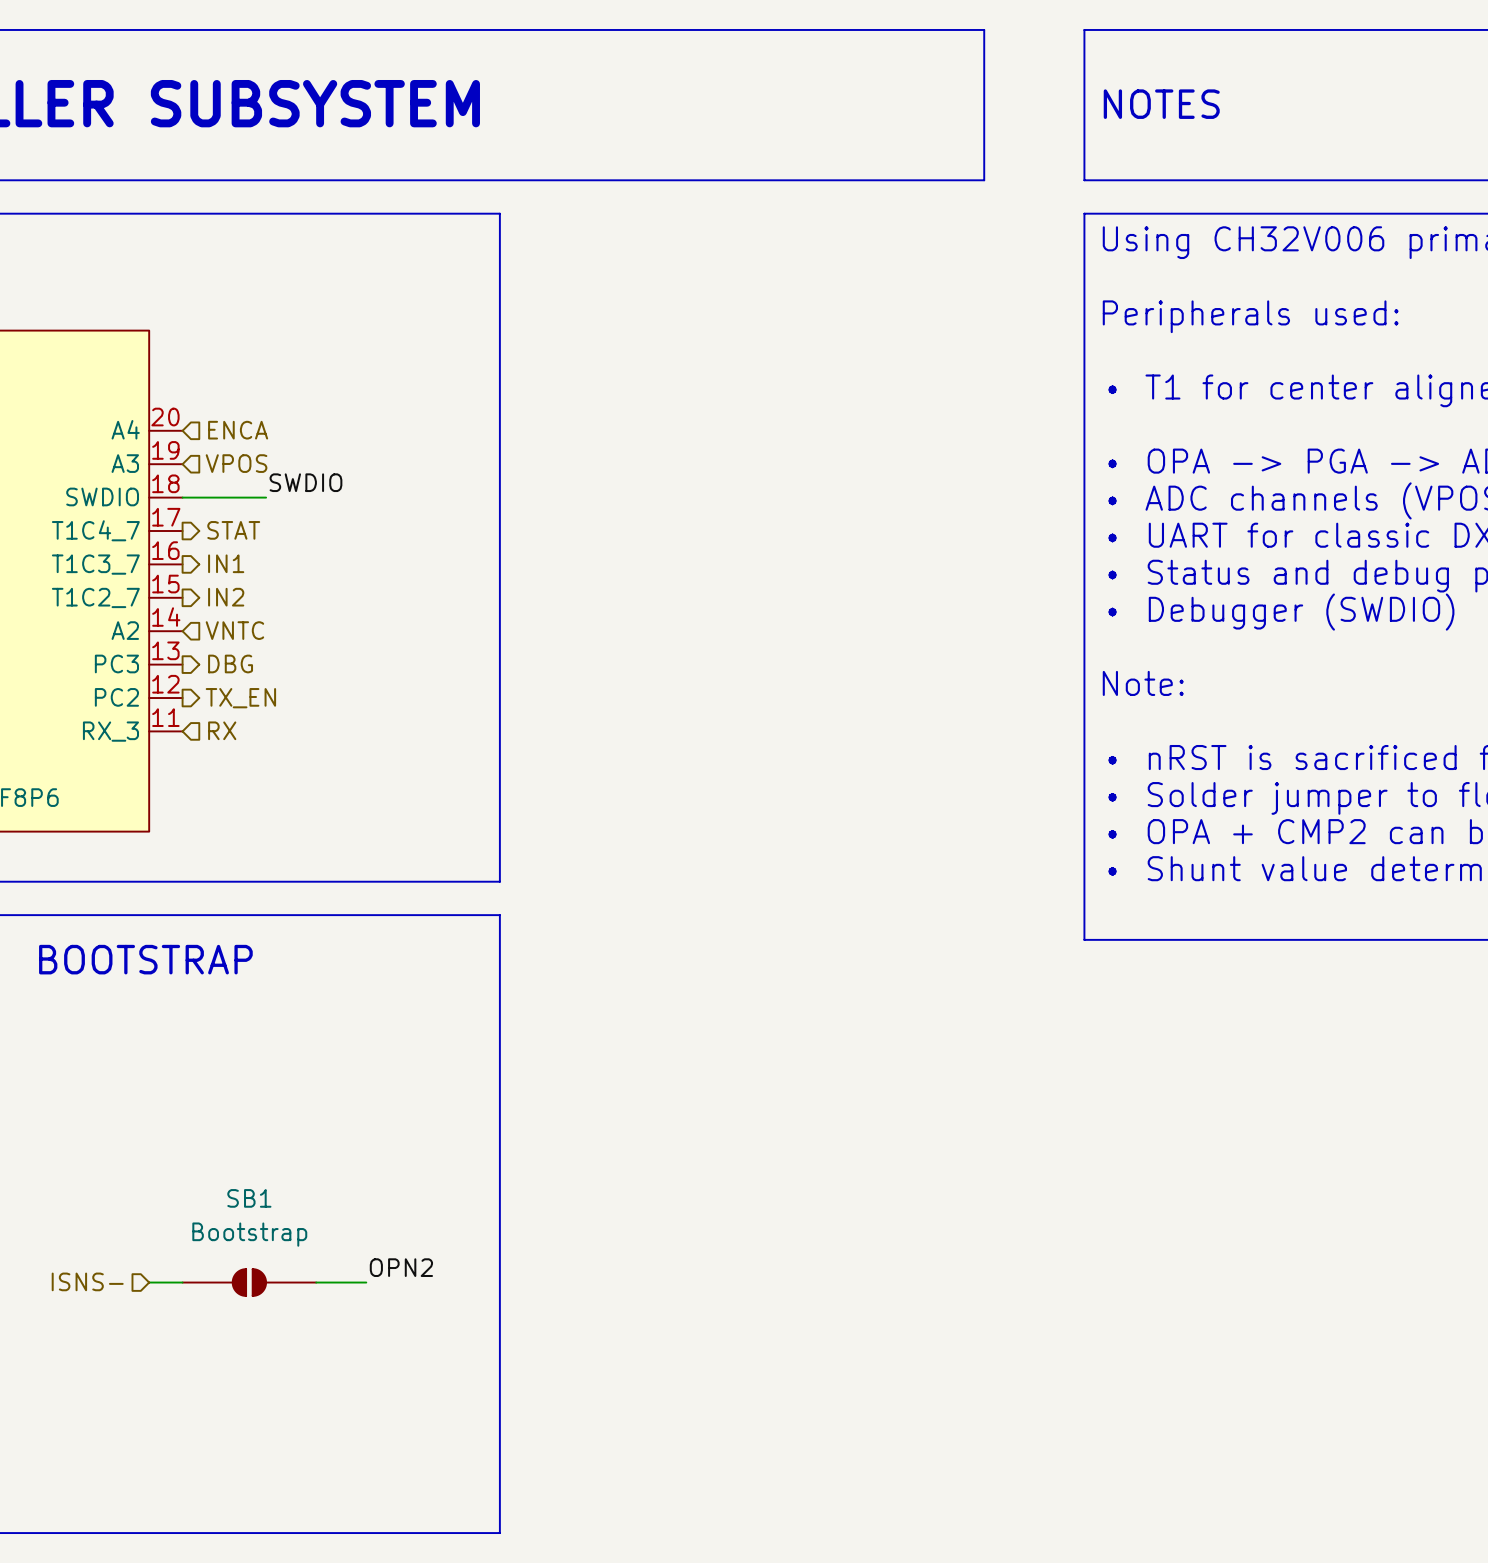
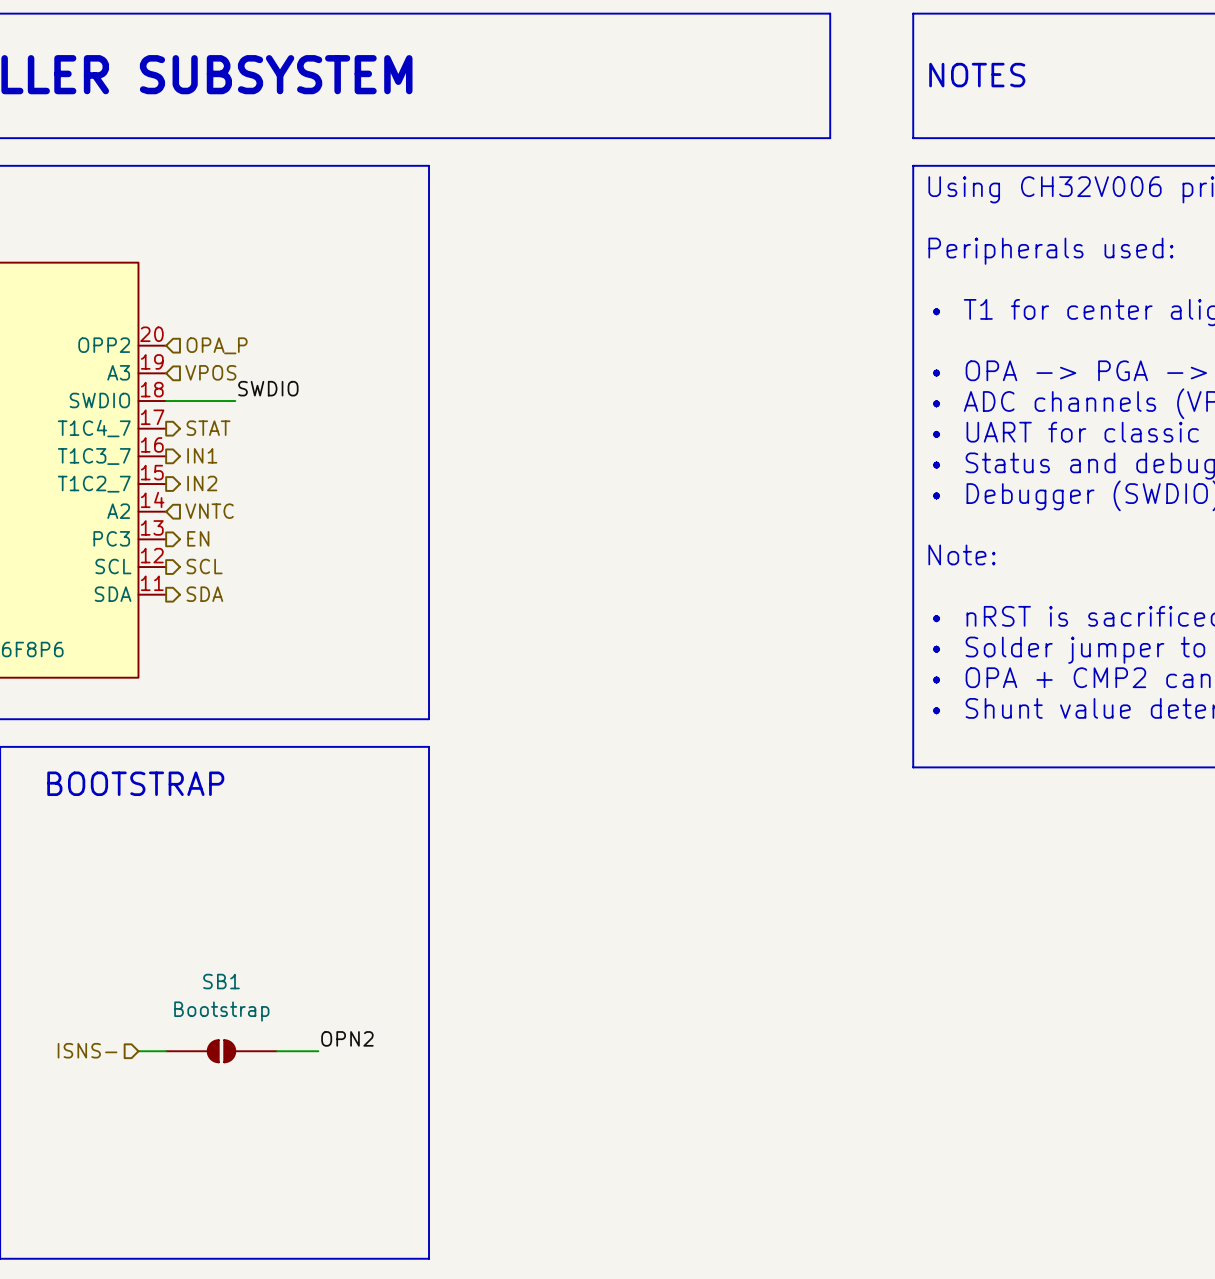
part pin name: A4 (125, 429) -> OPP2 (104, 345)
hierarchical label: ENCA (238, 430) -> OPA_P (217, 345)
hierarchical label: DBG (230, 663) -> EN (198, 538)
part pin name: PC2 (116, 697) -> SCL (113, 566)
hierarchical label: TX_EN (240, 698) -> SCL (204, 566)
hierarchical label shape: input (222, 730) -> output (204, 594)
hierarchical label: RX (222, 730) -> SDA (204, 594)
part pin name: RX_3 (110, 731) -> SDA (113, 594)

